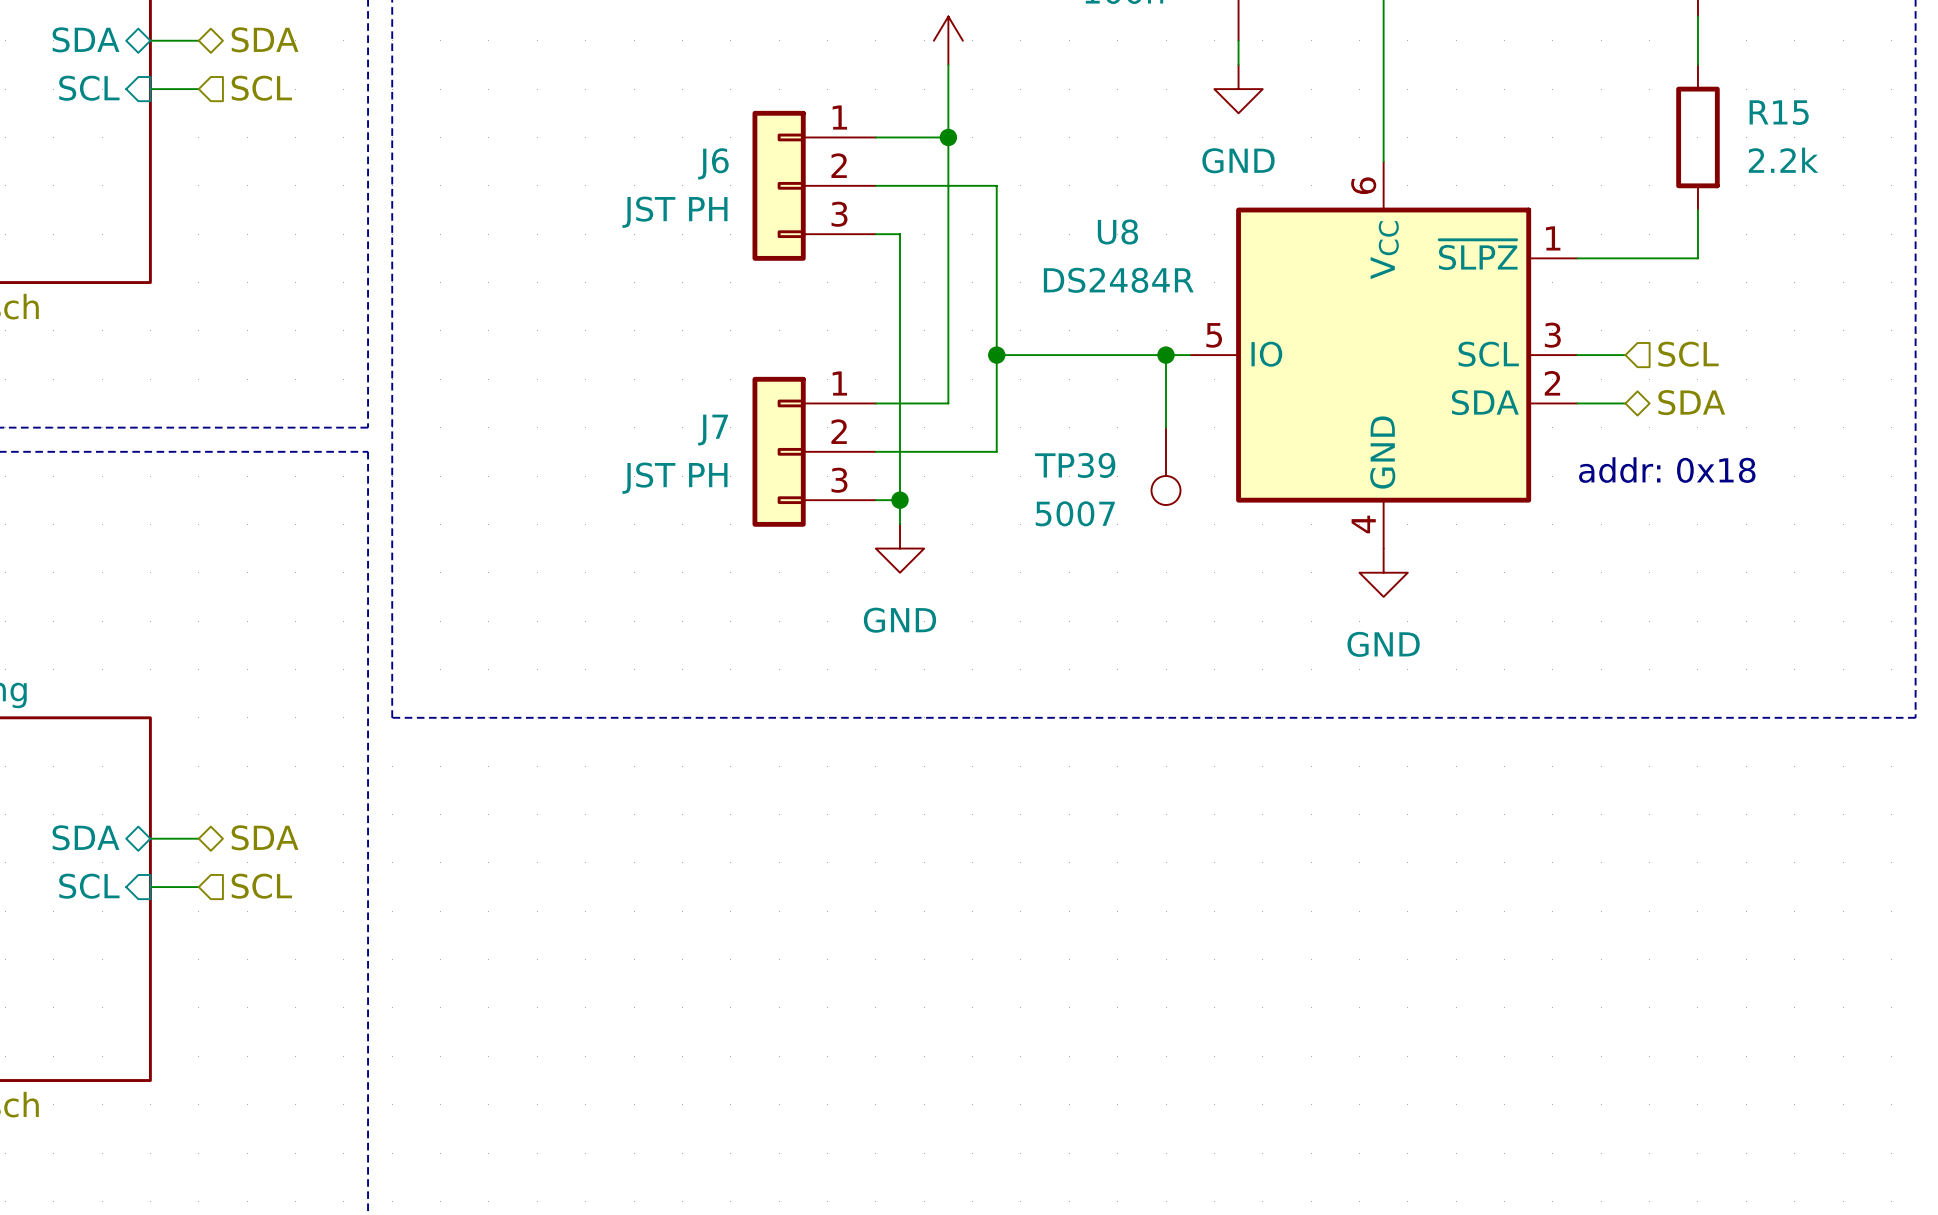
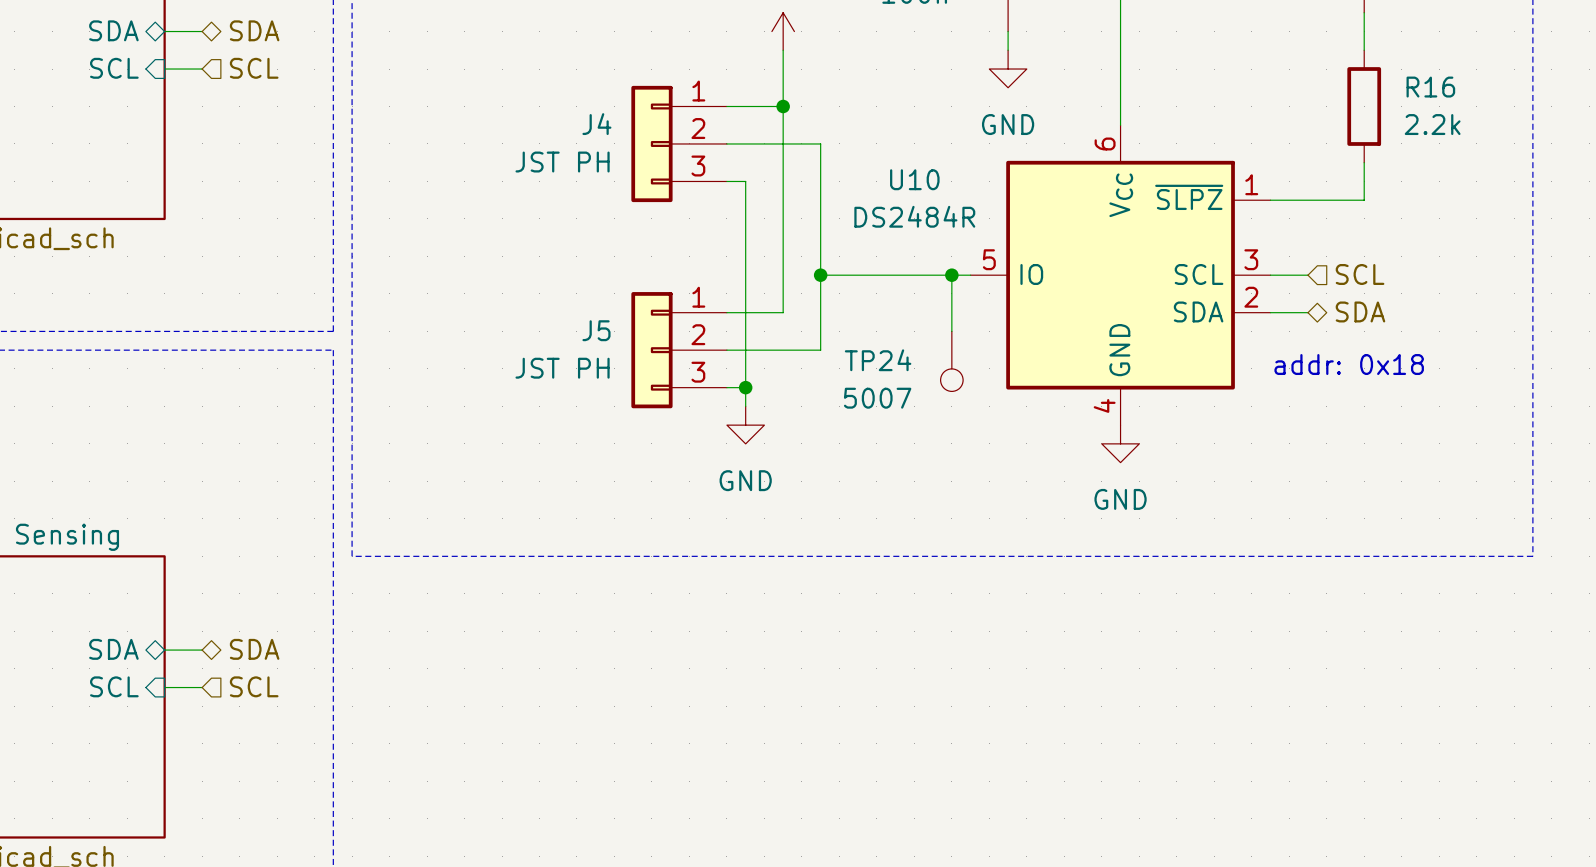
R15 name: R15 (1779, 112) -> R16 (1430, 87)
J6 name: J6 (713, 163) -> J4 (596, 124)
U8 name: U8 (1117, 231) -> U10 (914, 179)
J7 name: J7 (713, 430) -> J5 (596, 330)
TP39 name: TP39 (1075, 465) -> TP24 (878, 360)

